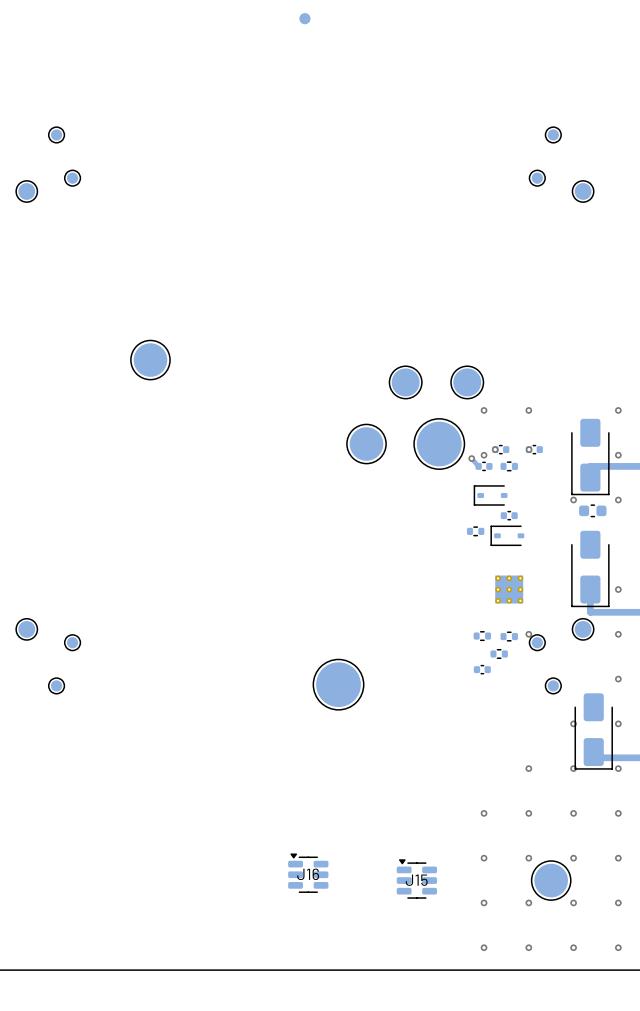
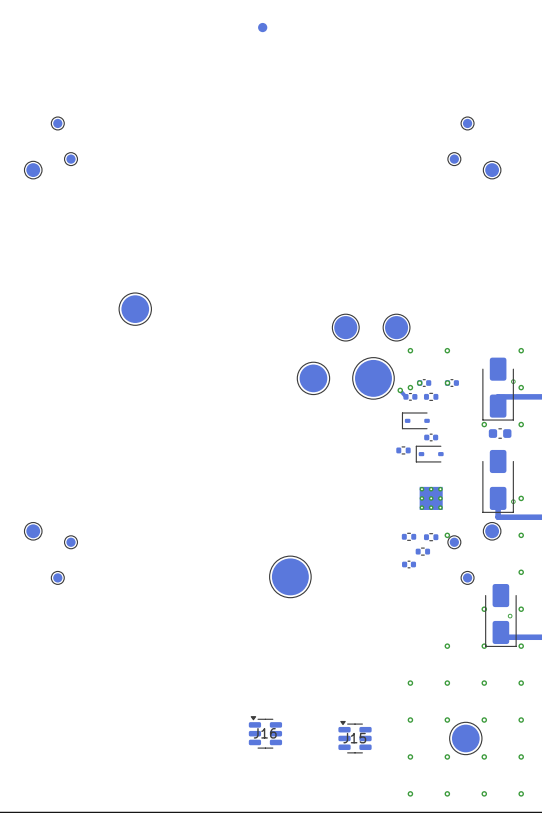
via: none -> (513, 381)
via: none -> (513, 501)
via: none -> (510, 616)

